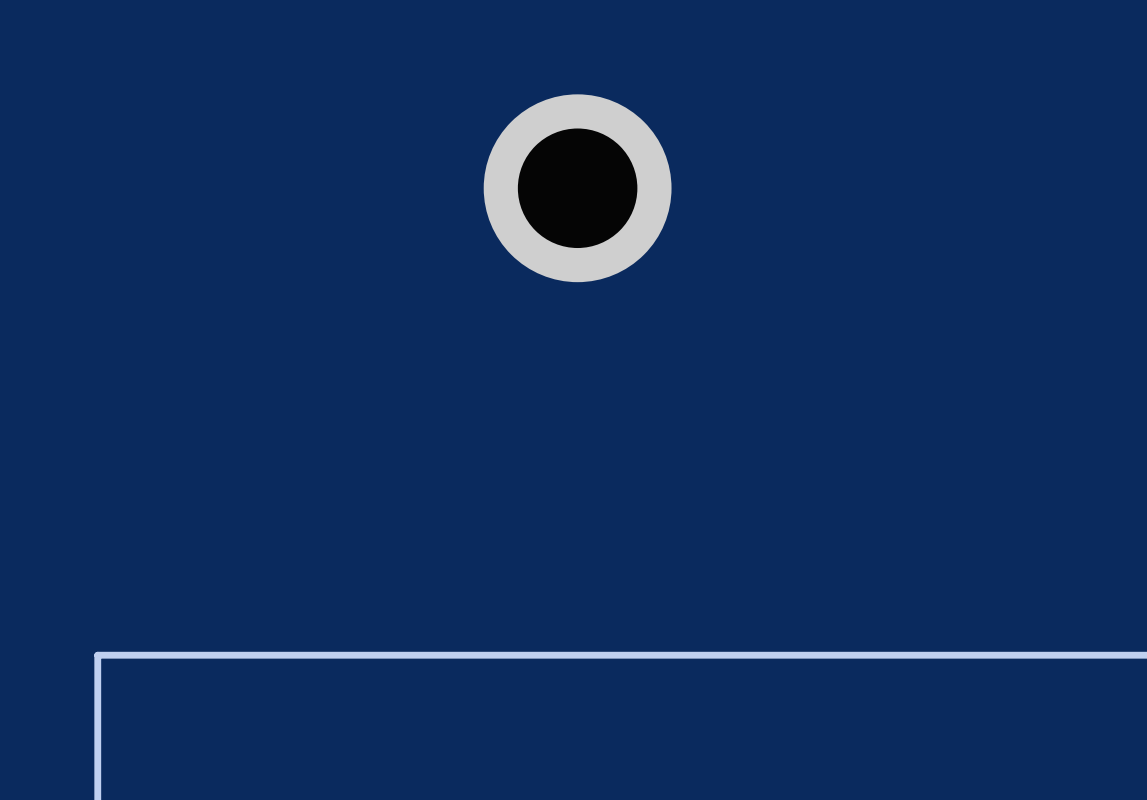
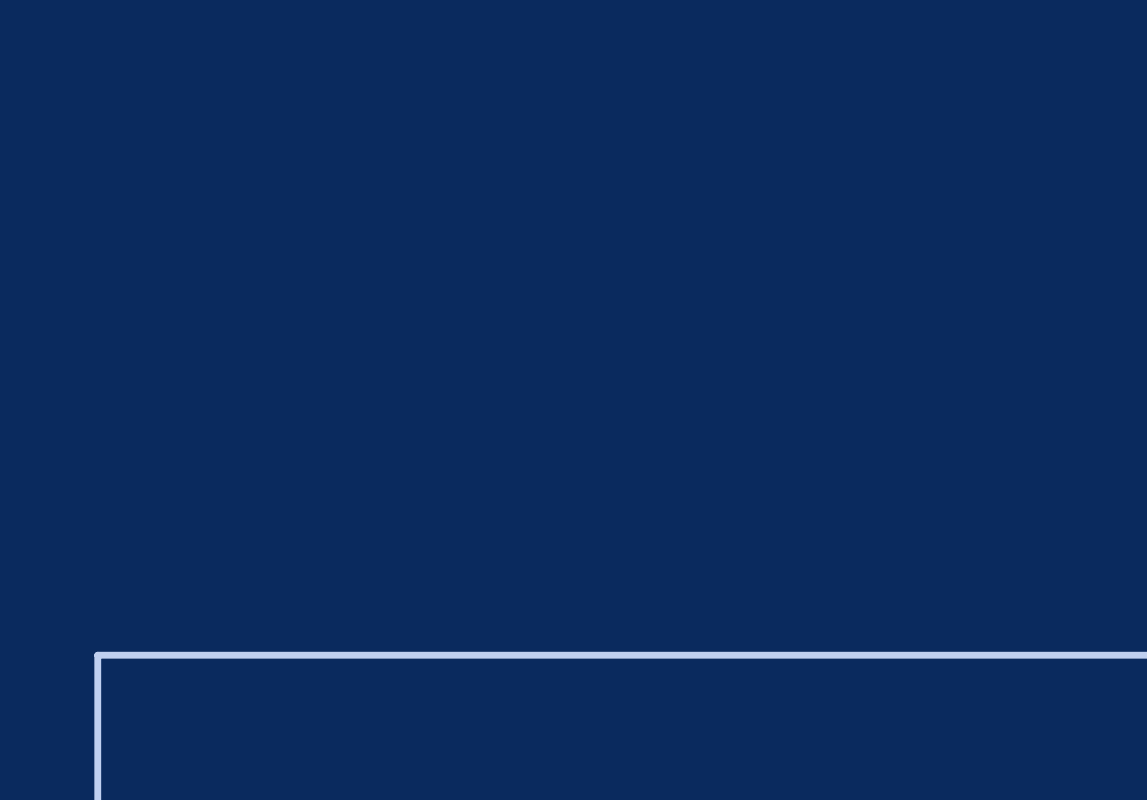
part: (577, 188) -> none

